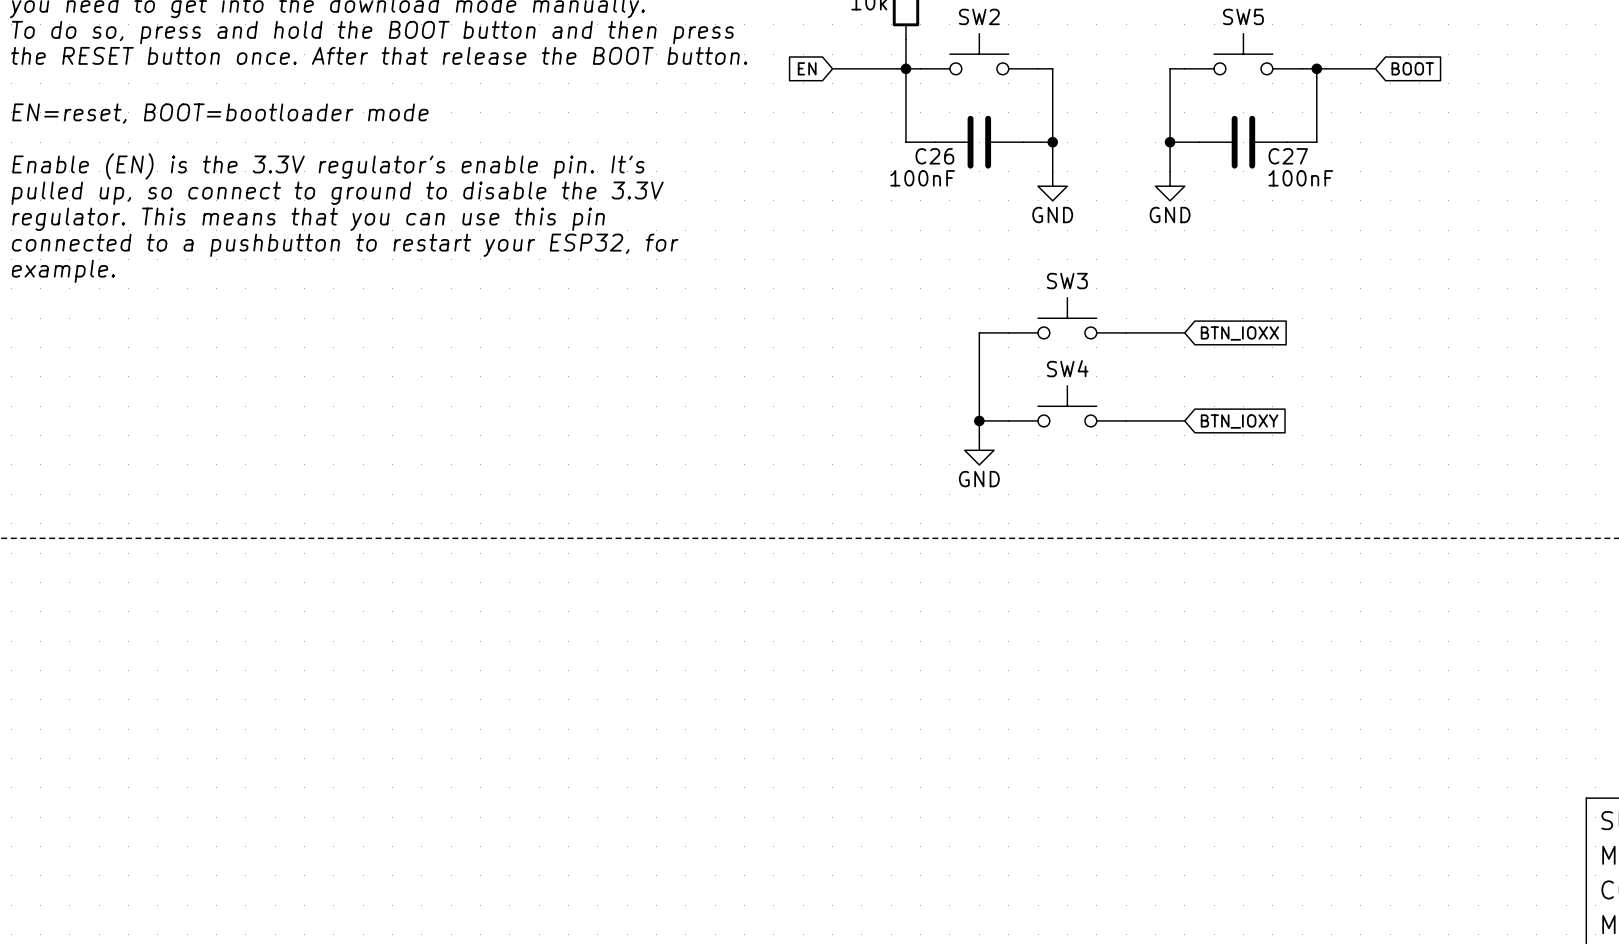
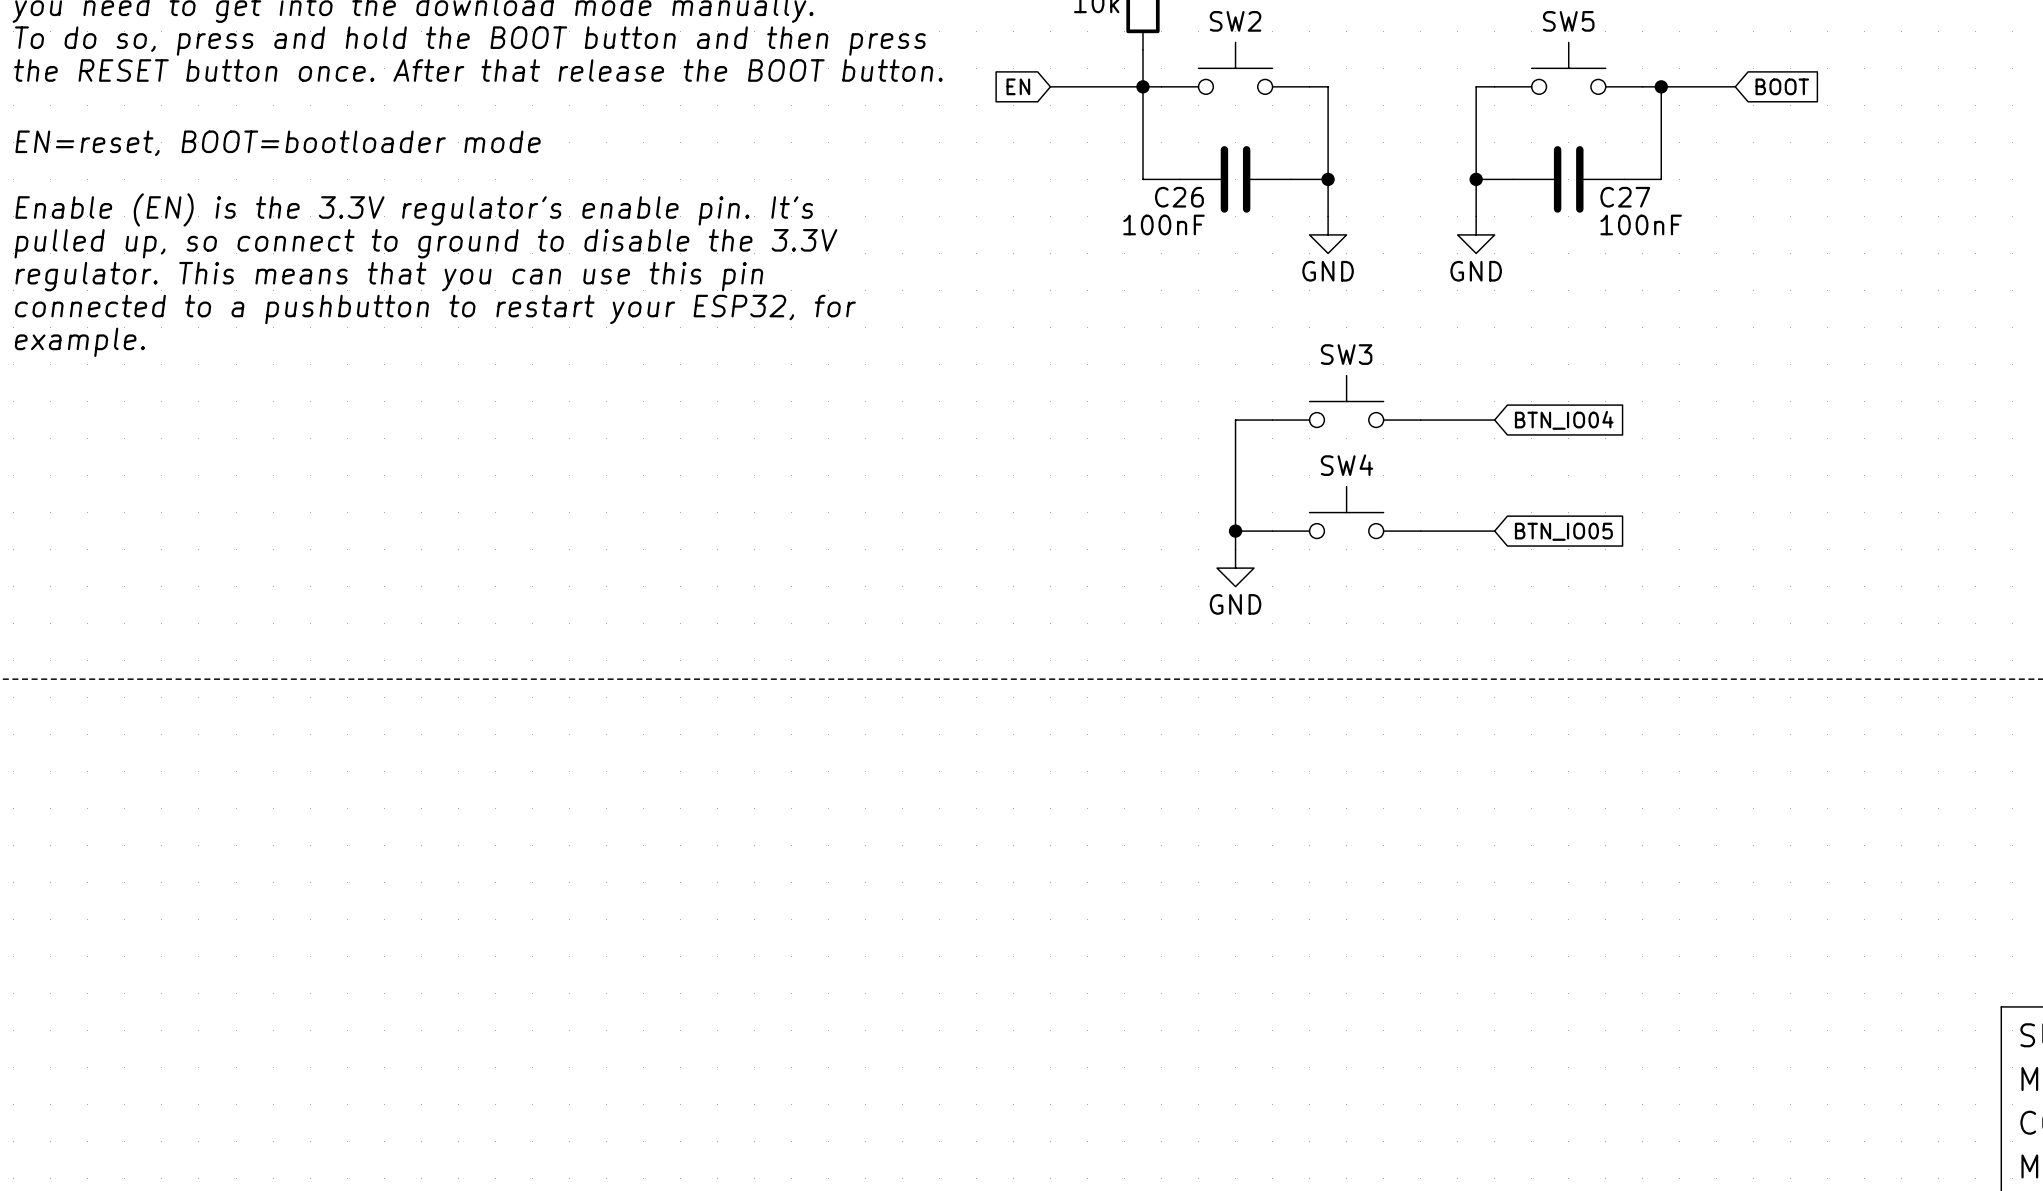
global label: BTN_IOXX (1239, 333) -> BTN_IO04 (1564, 420)
global label: BTN_IOXY (1239, 421) -> BTN_IO05 (1563, 531)

